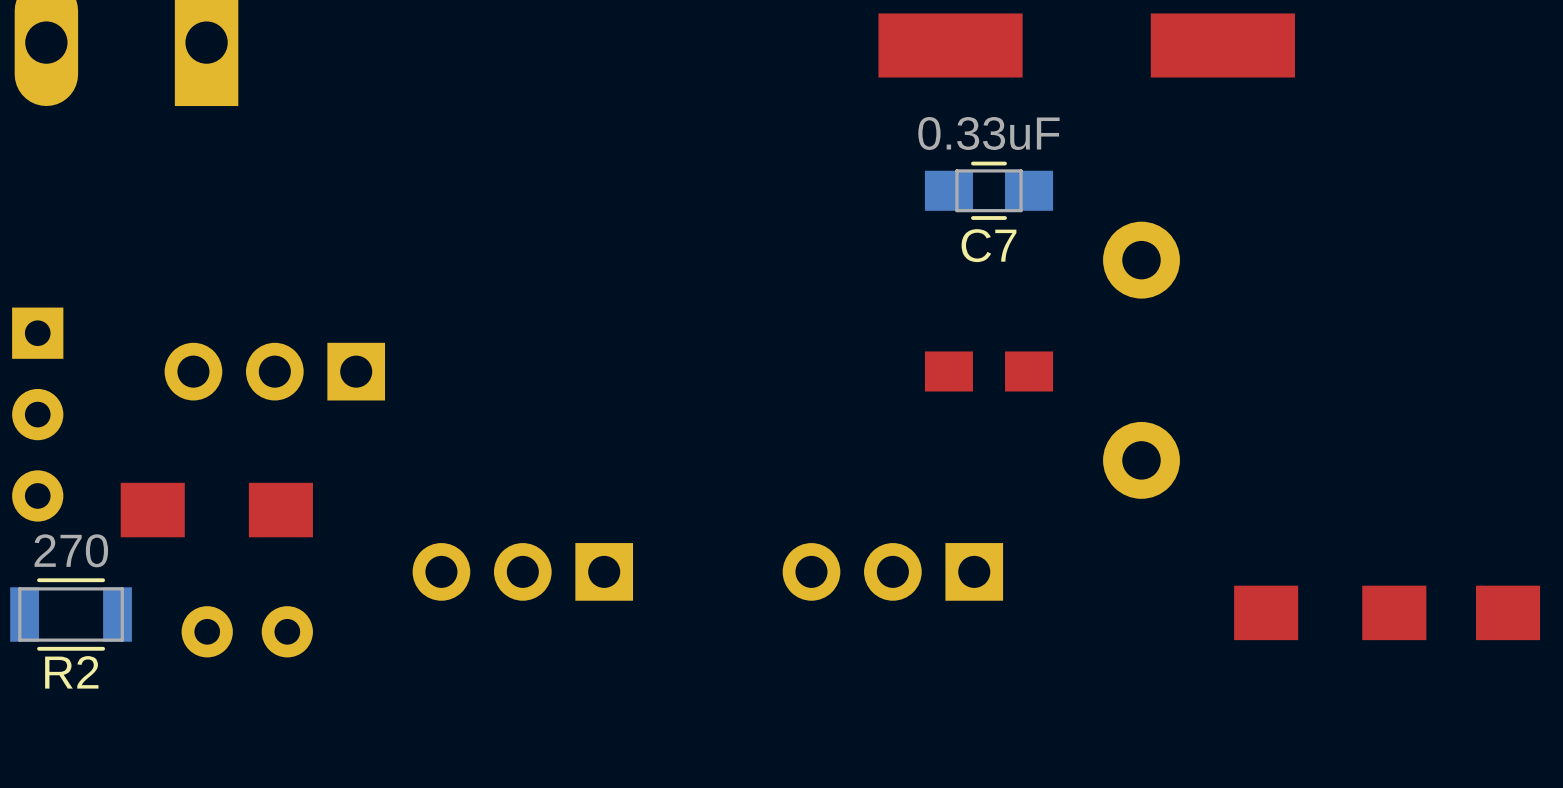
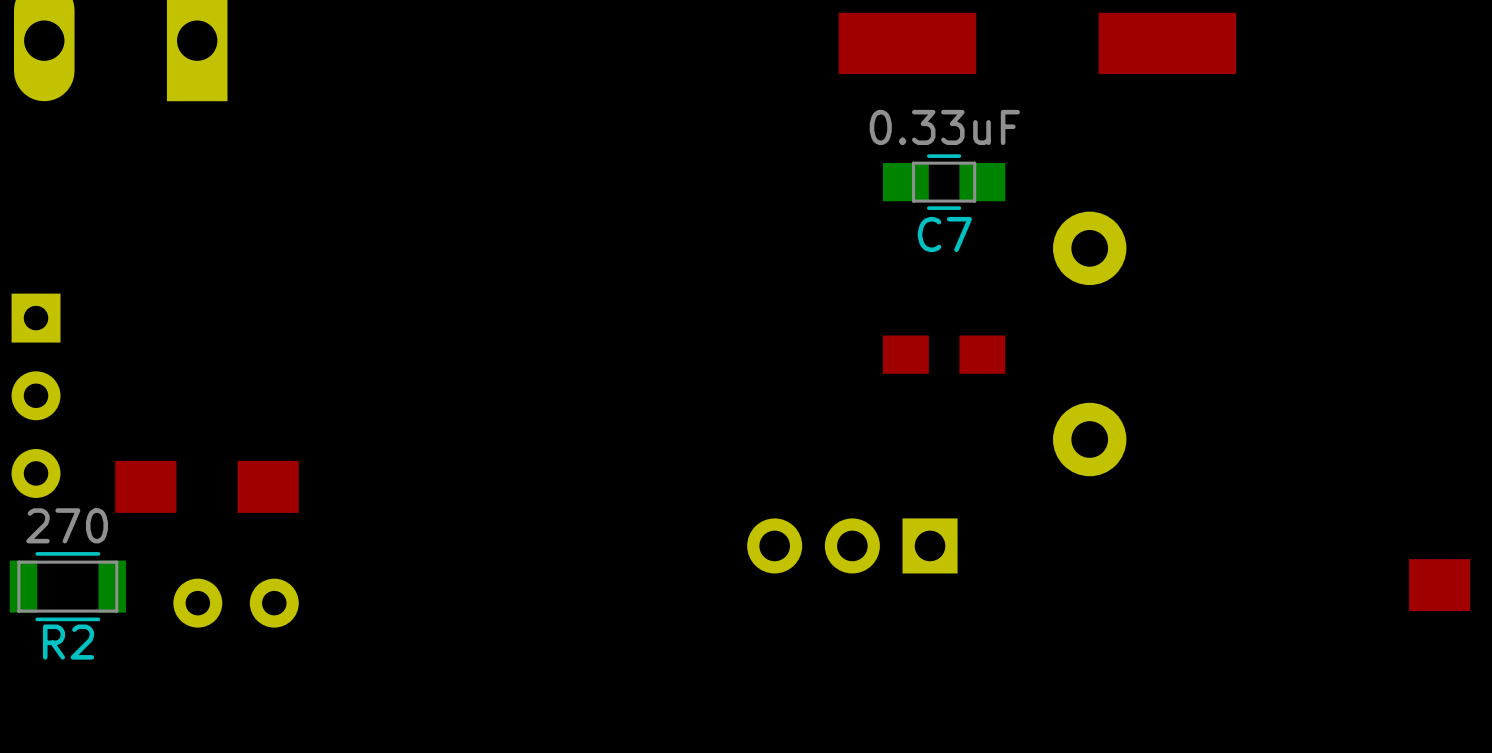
part: (274, 371) -> none
part: (522, 571) -> none
part: (1330, 612) -> none

